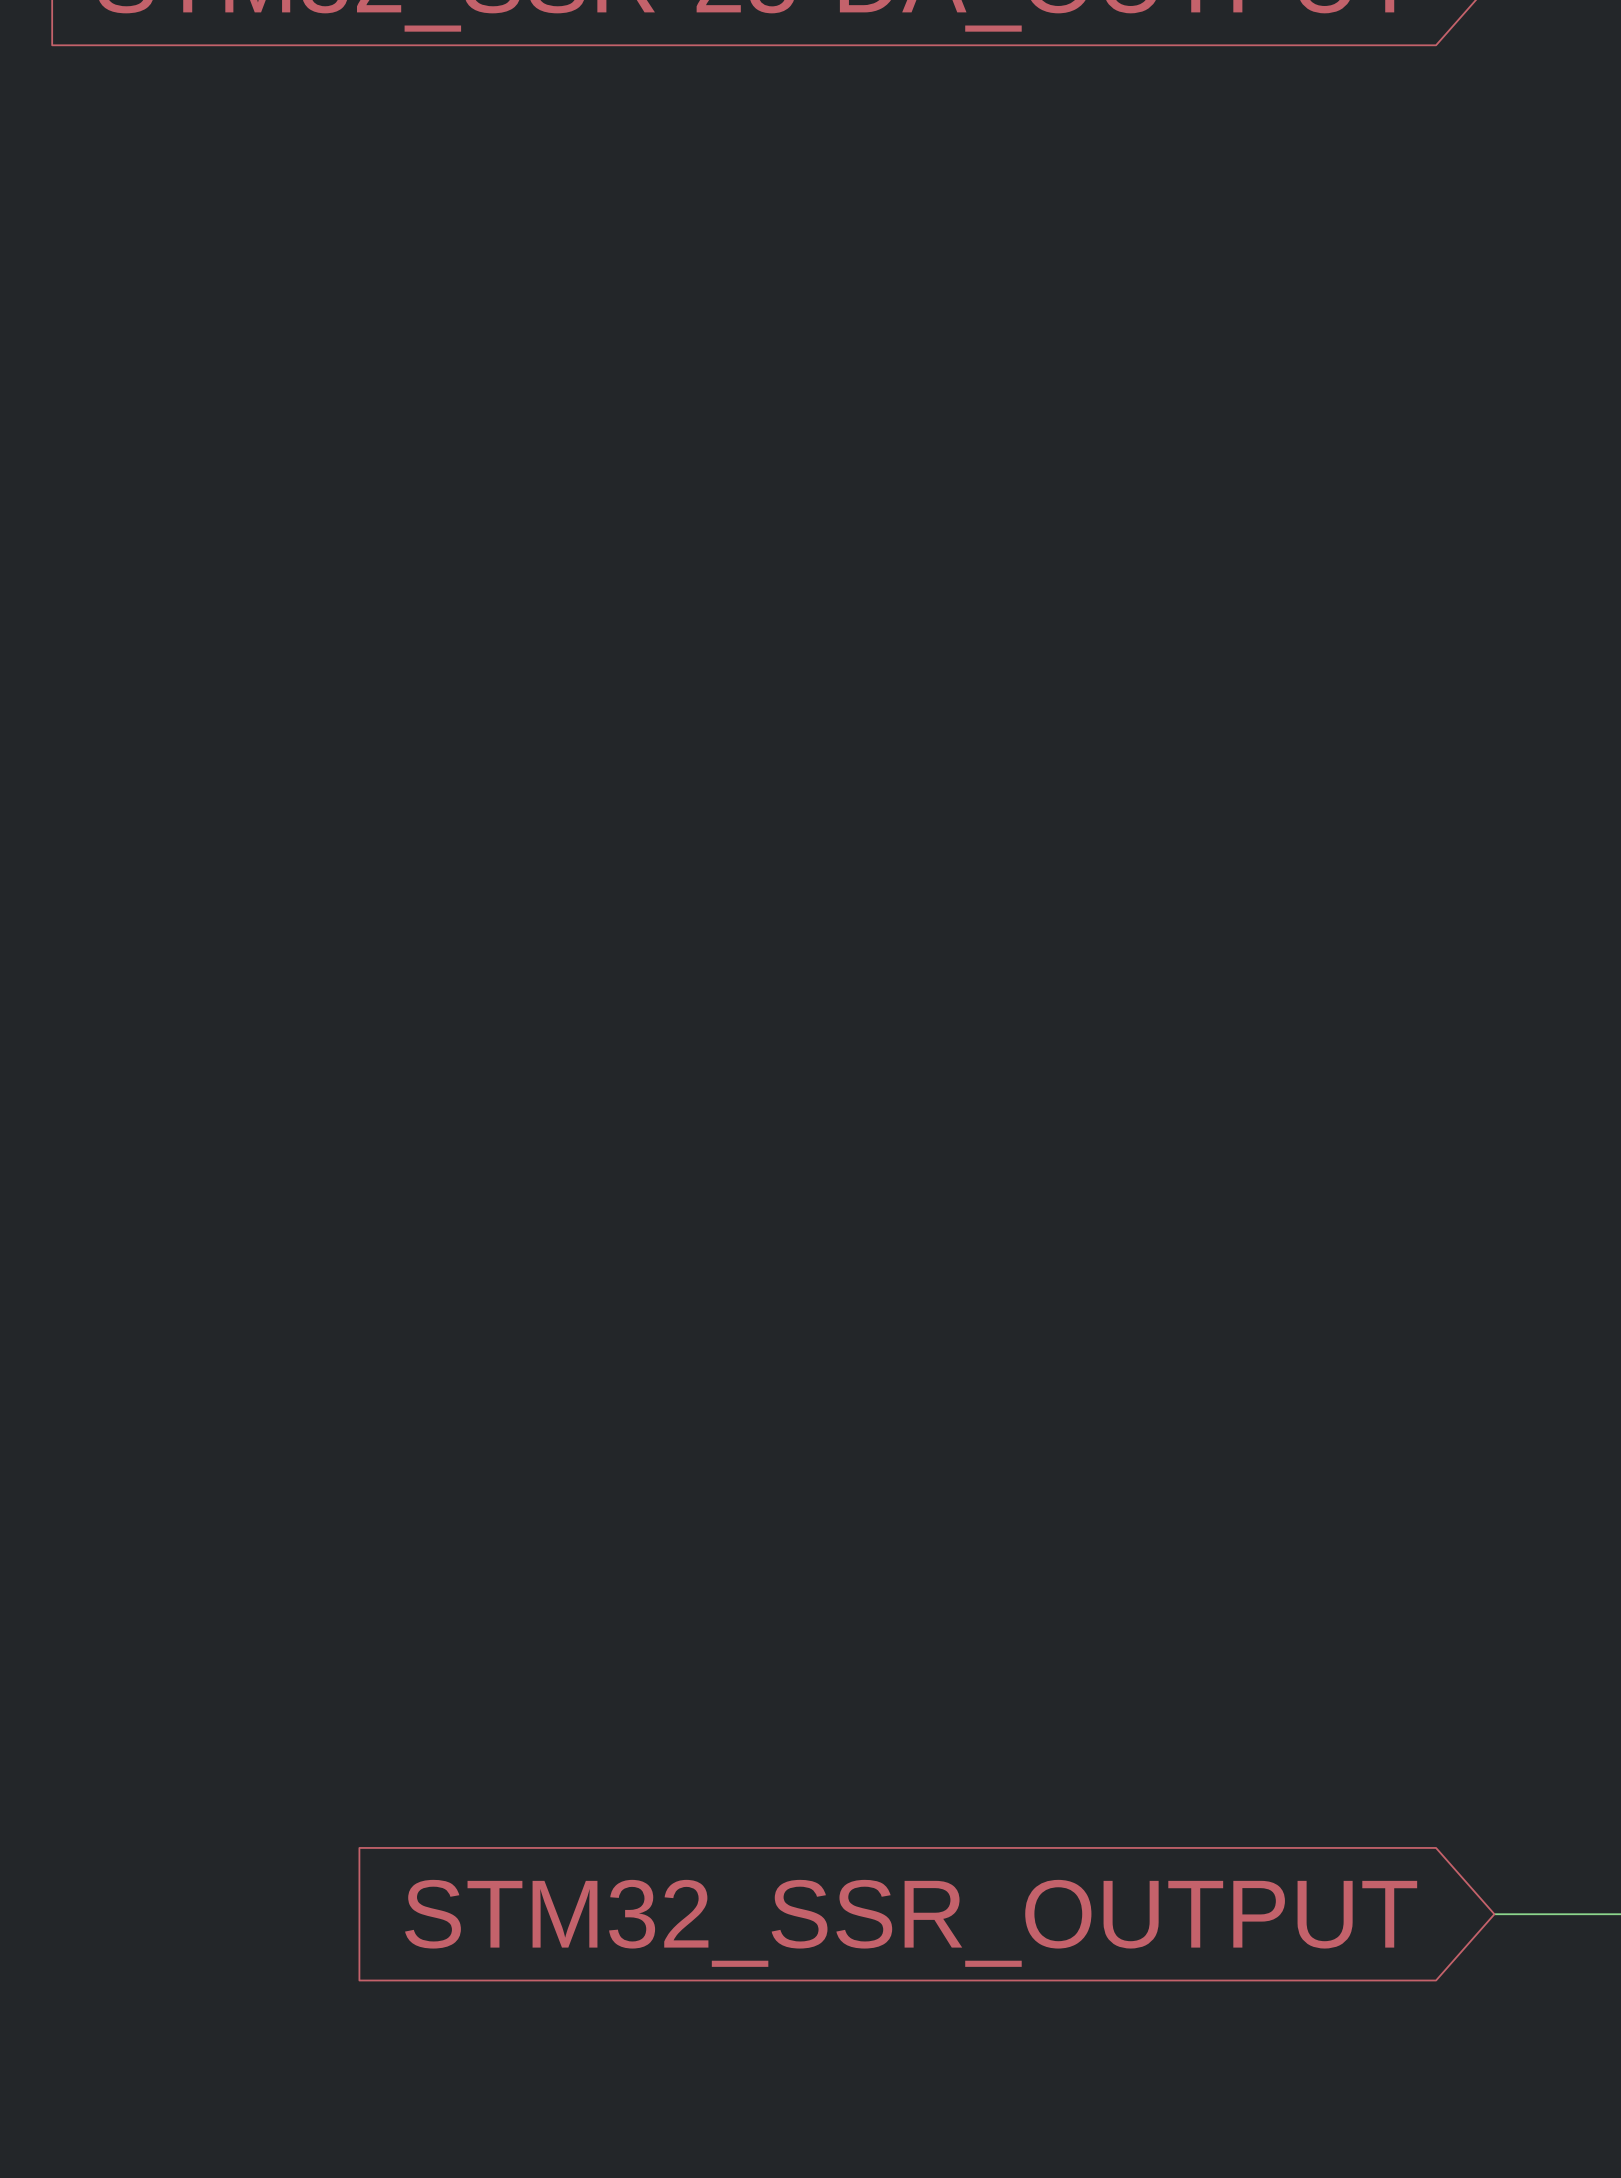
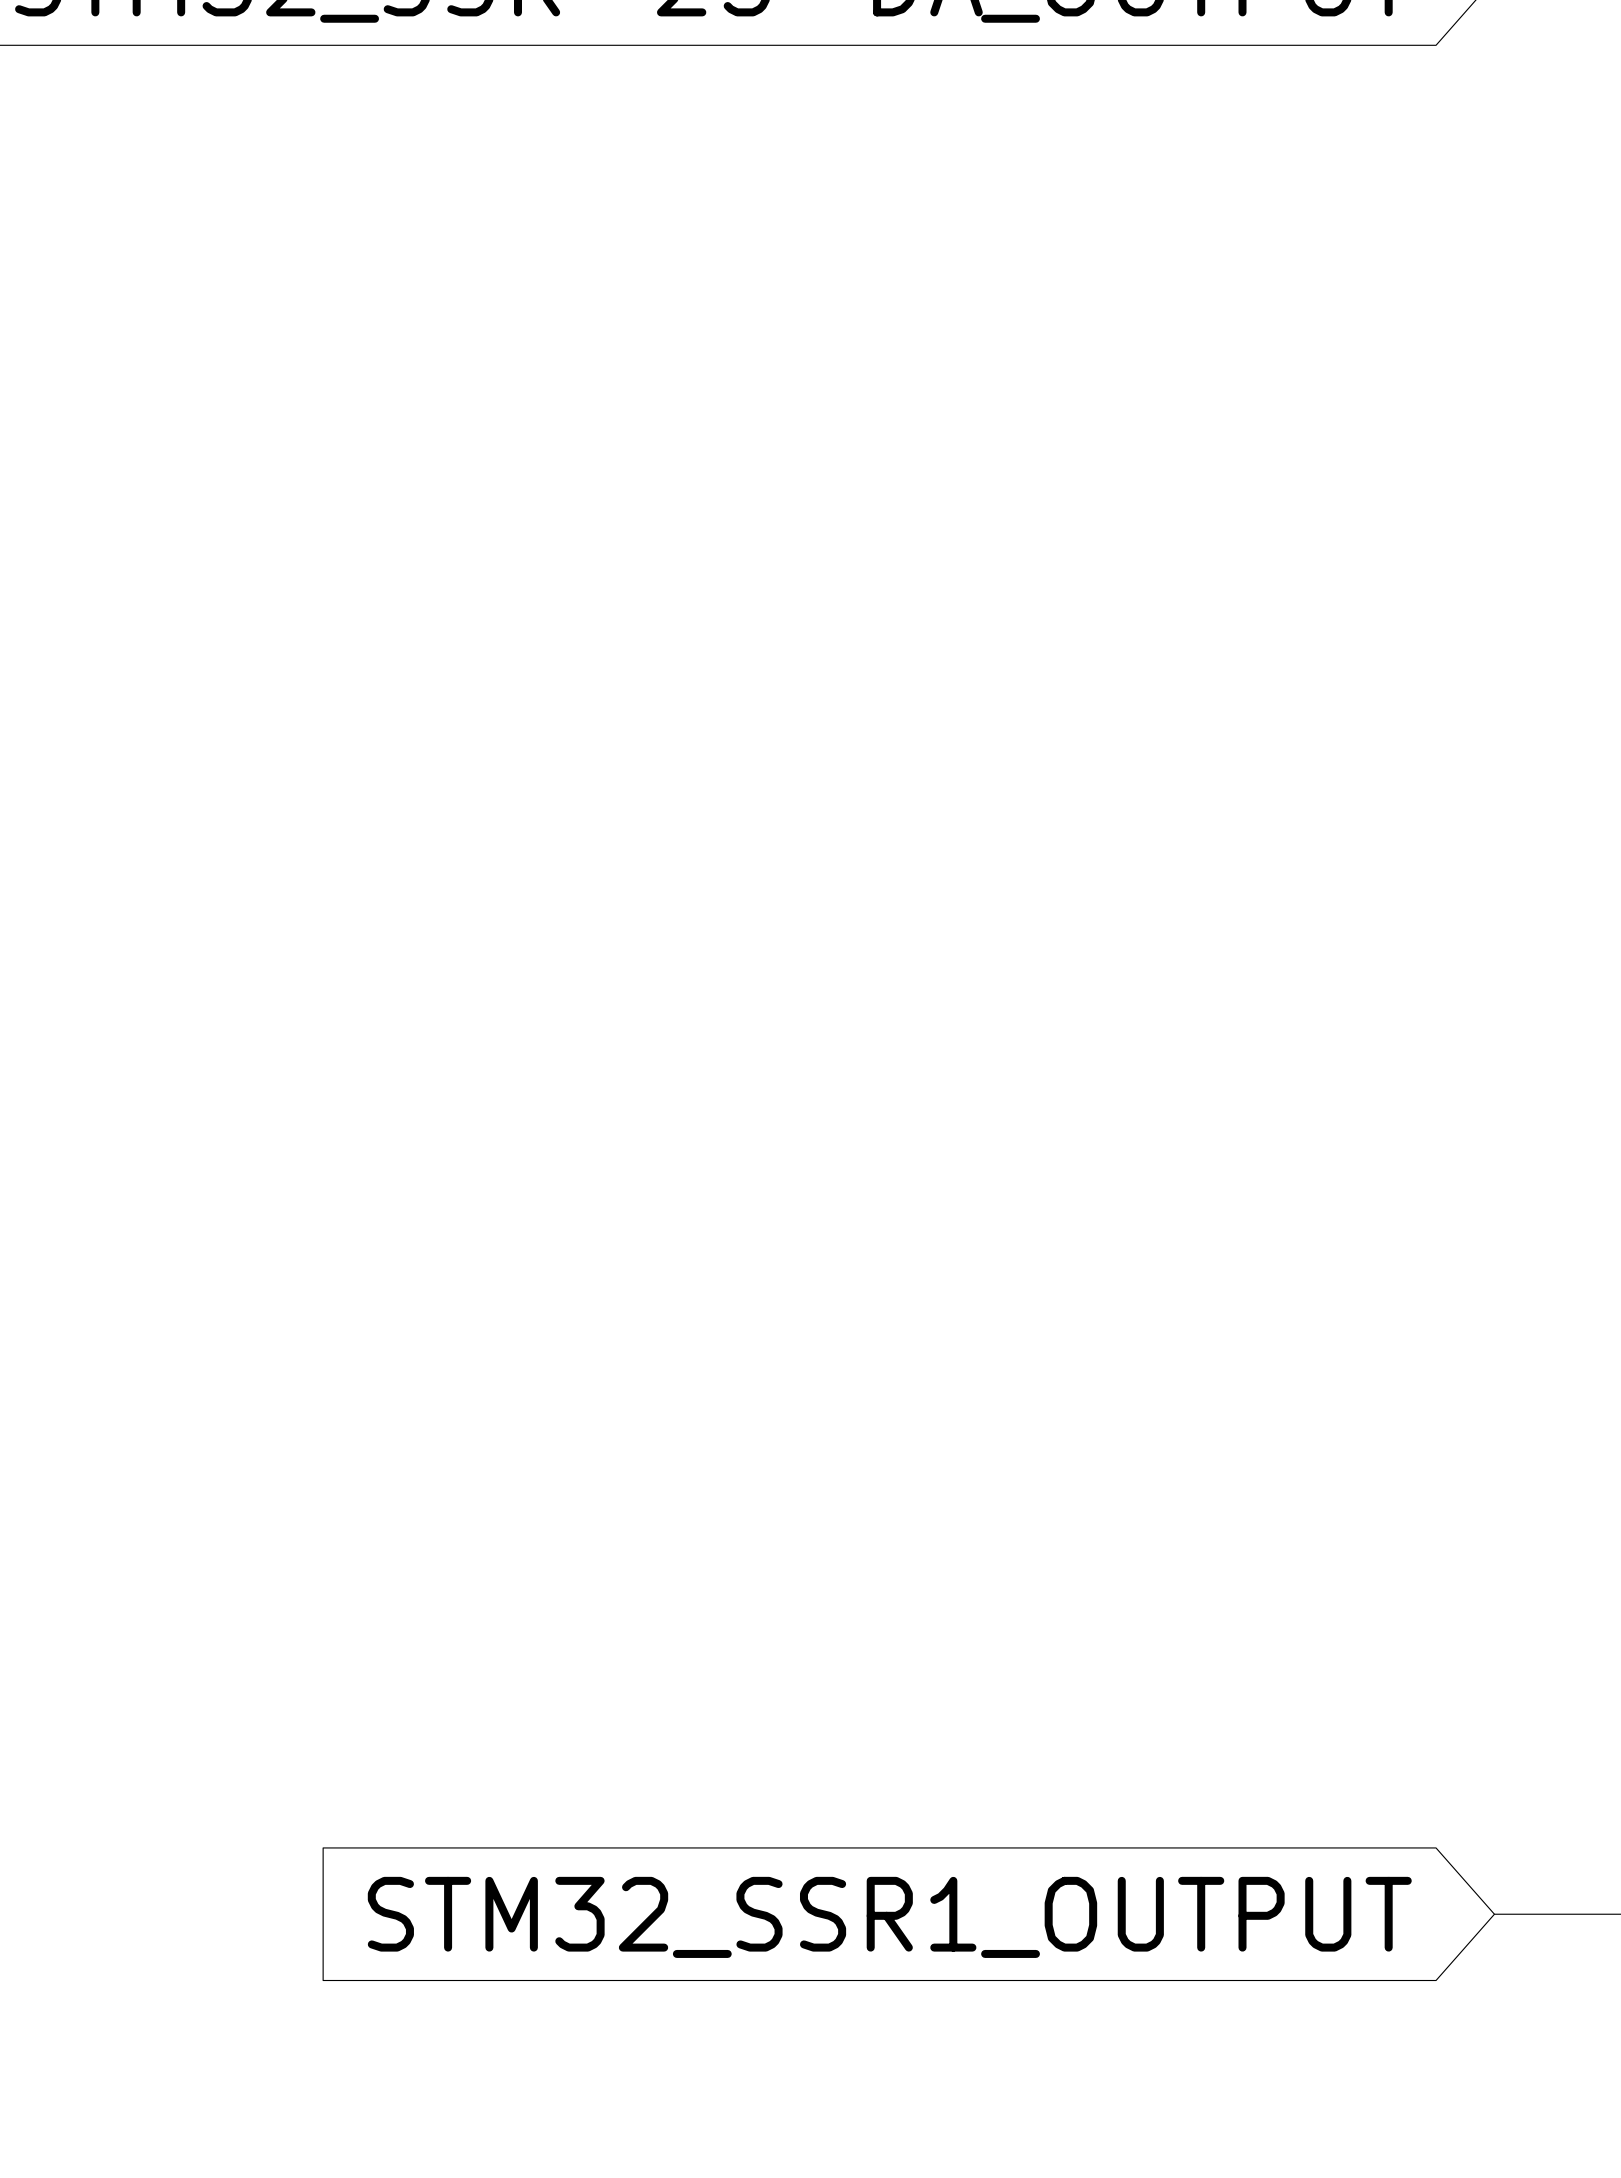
global label: STM32_SSR_OUTPUT (911, 1923) -> STM32_SSR1_OUTPUT (889, 1917)

